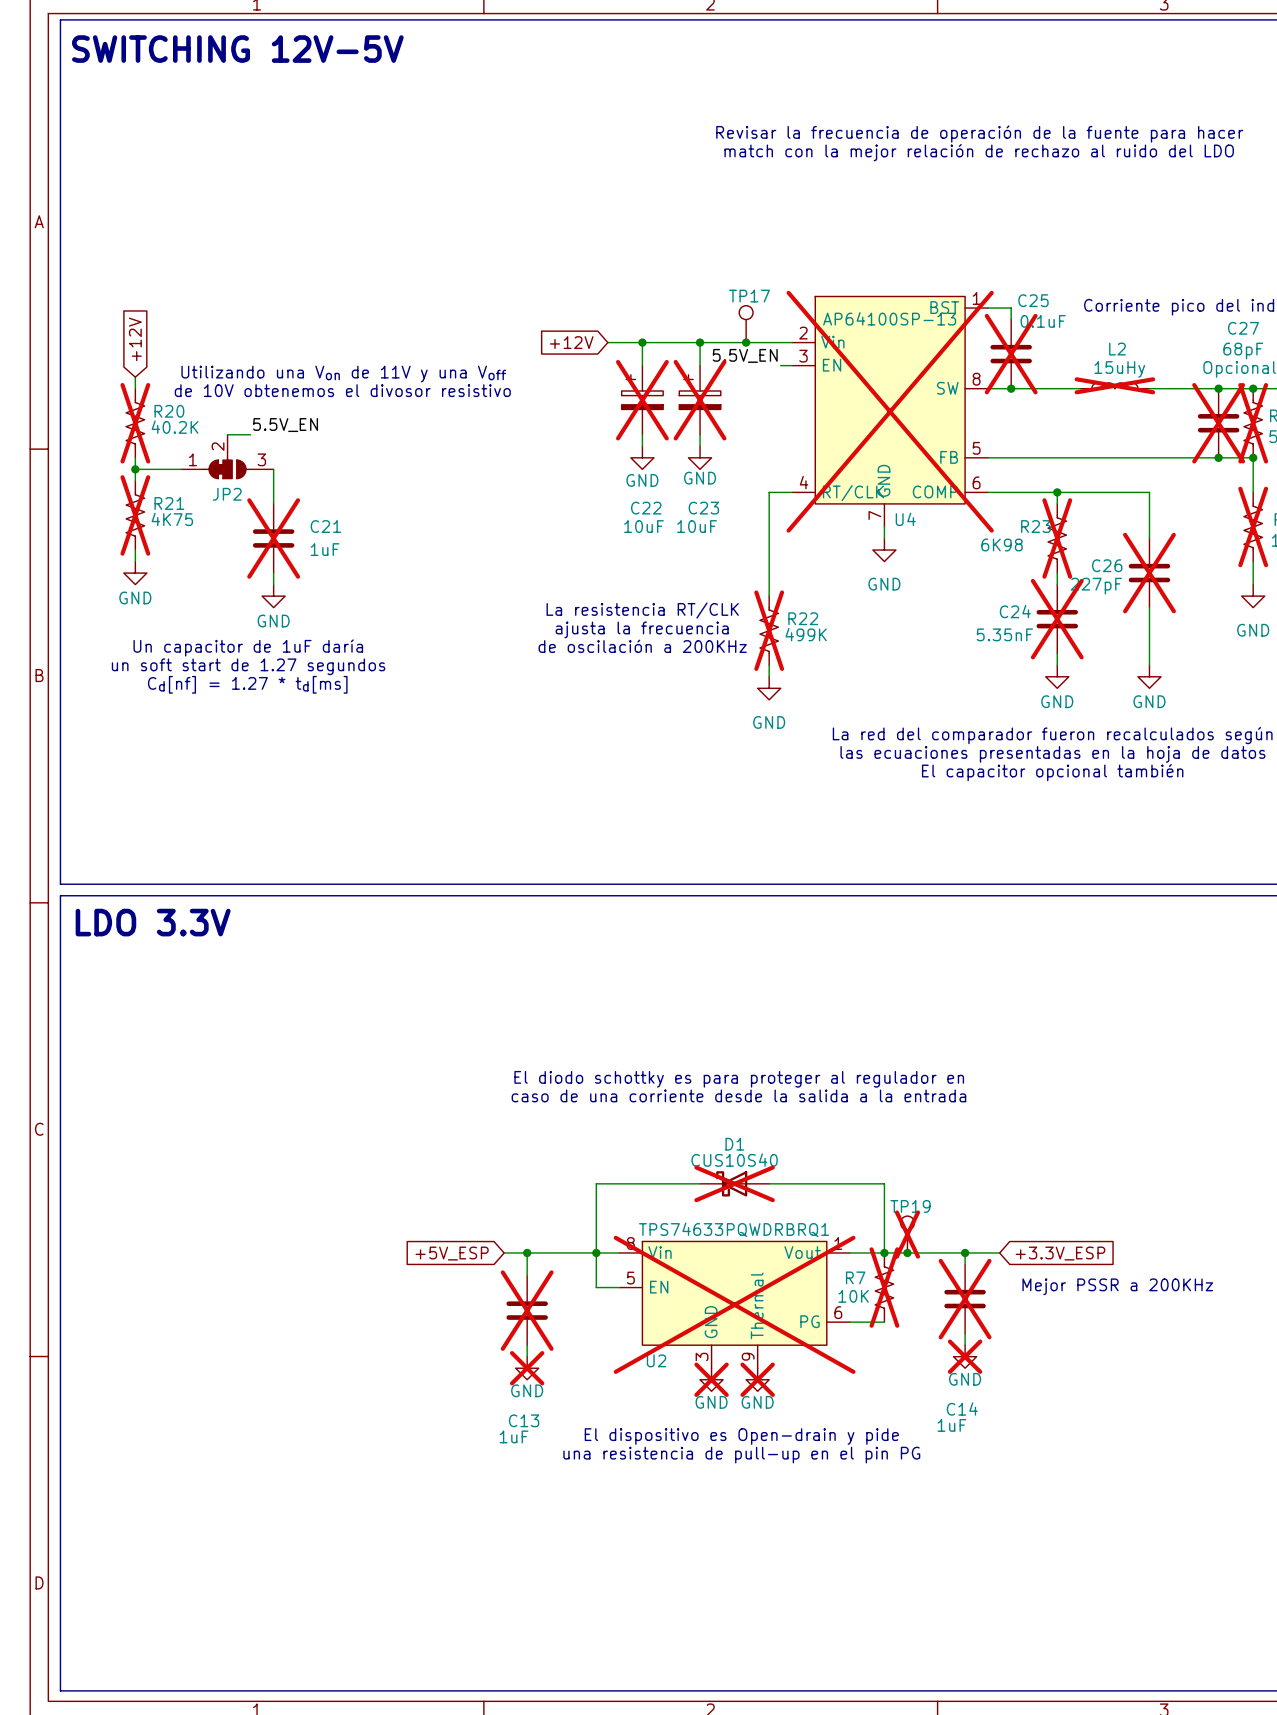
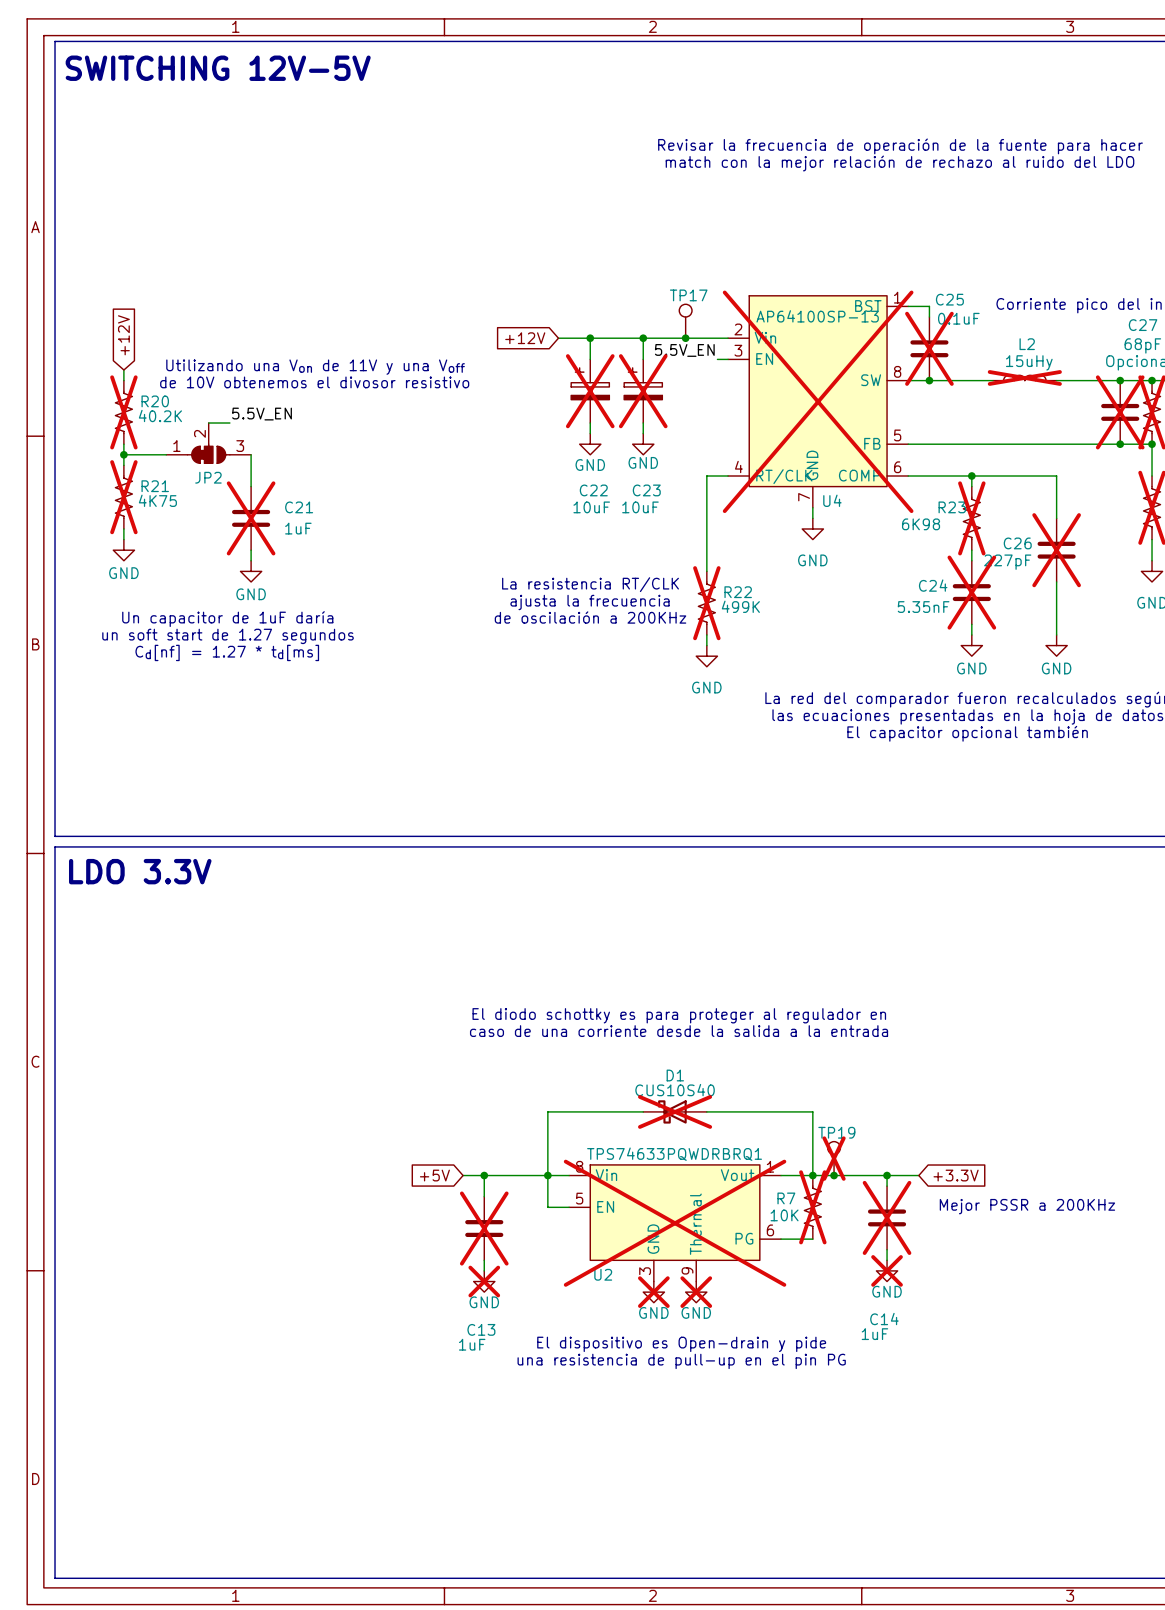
global label: +5V_ESP (452, 1253) -> +5V (434, 1175)
global label: +3.3V_ESP (1060, 1253) -> +3.3V (956, 1175)

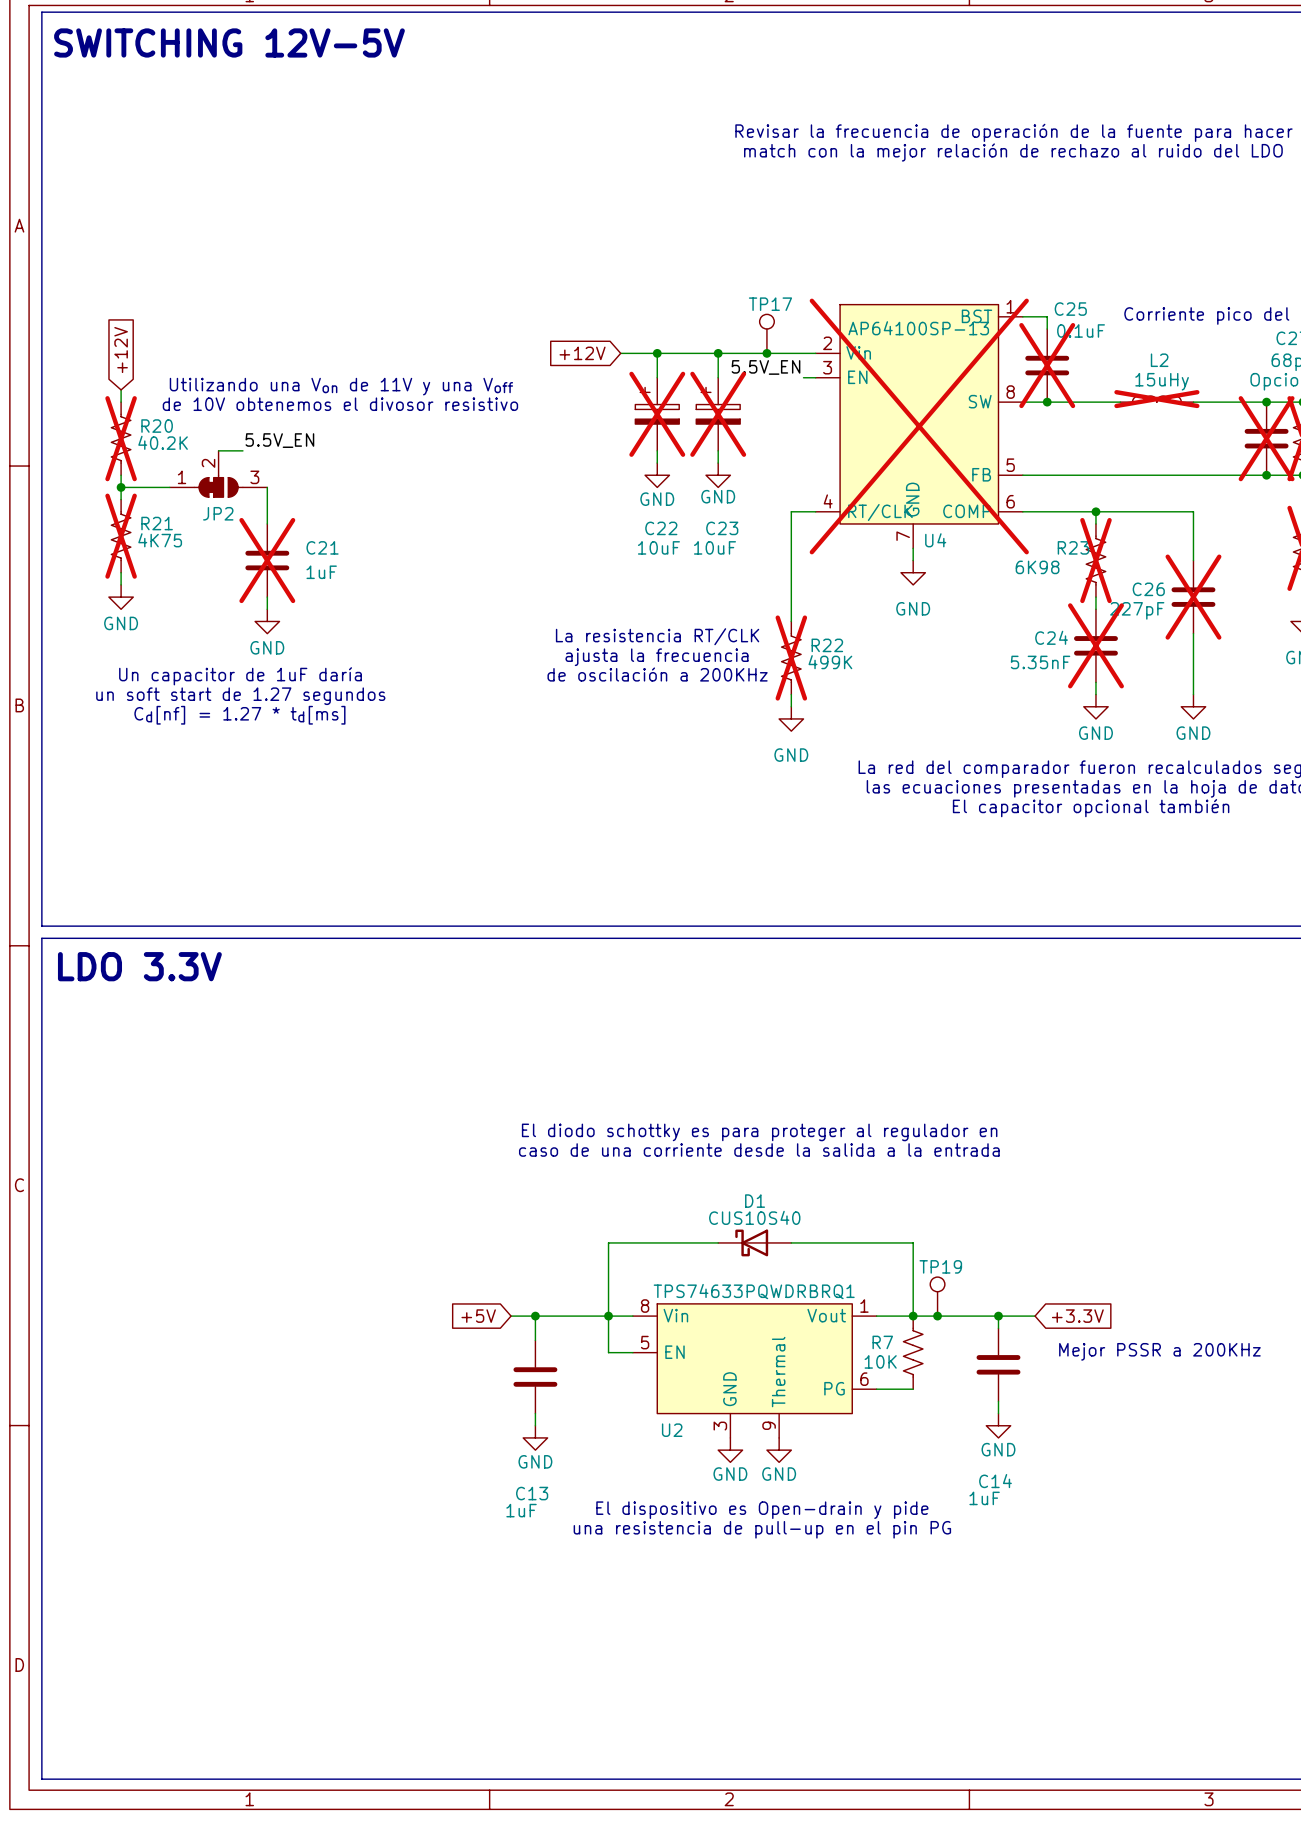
D1 do-not-place cross: (675, 1111) -> none
TP19 do-not-place cross: (834, 1158) -> none
R7 do-not-place cross: (812, 1207) -> none
C14 do-not-place cross: (887, 1217) -> none
U2 do-not-place cross: (675, 1223) -> none
C13 do-not-place cross: (484, 1228) -> none
power symbol do-not-place cross: (887, 1270) -> none
power symbol do-not-place cross: (484, 1281) -> none
power symbol do-not-place cross: (653, 1292) -> none
power symbol do-not-place cross: (696, 1292) -> none

